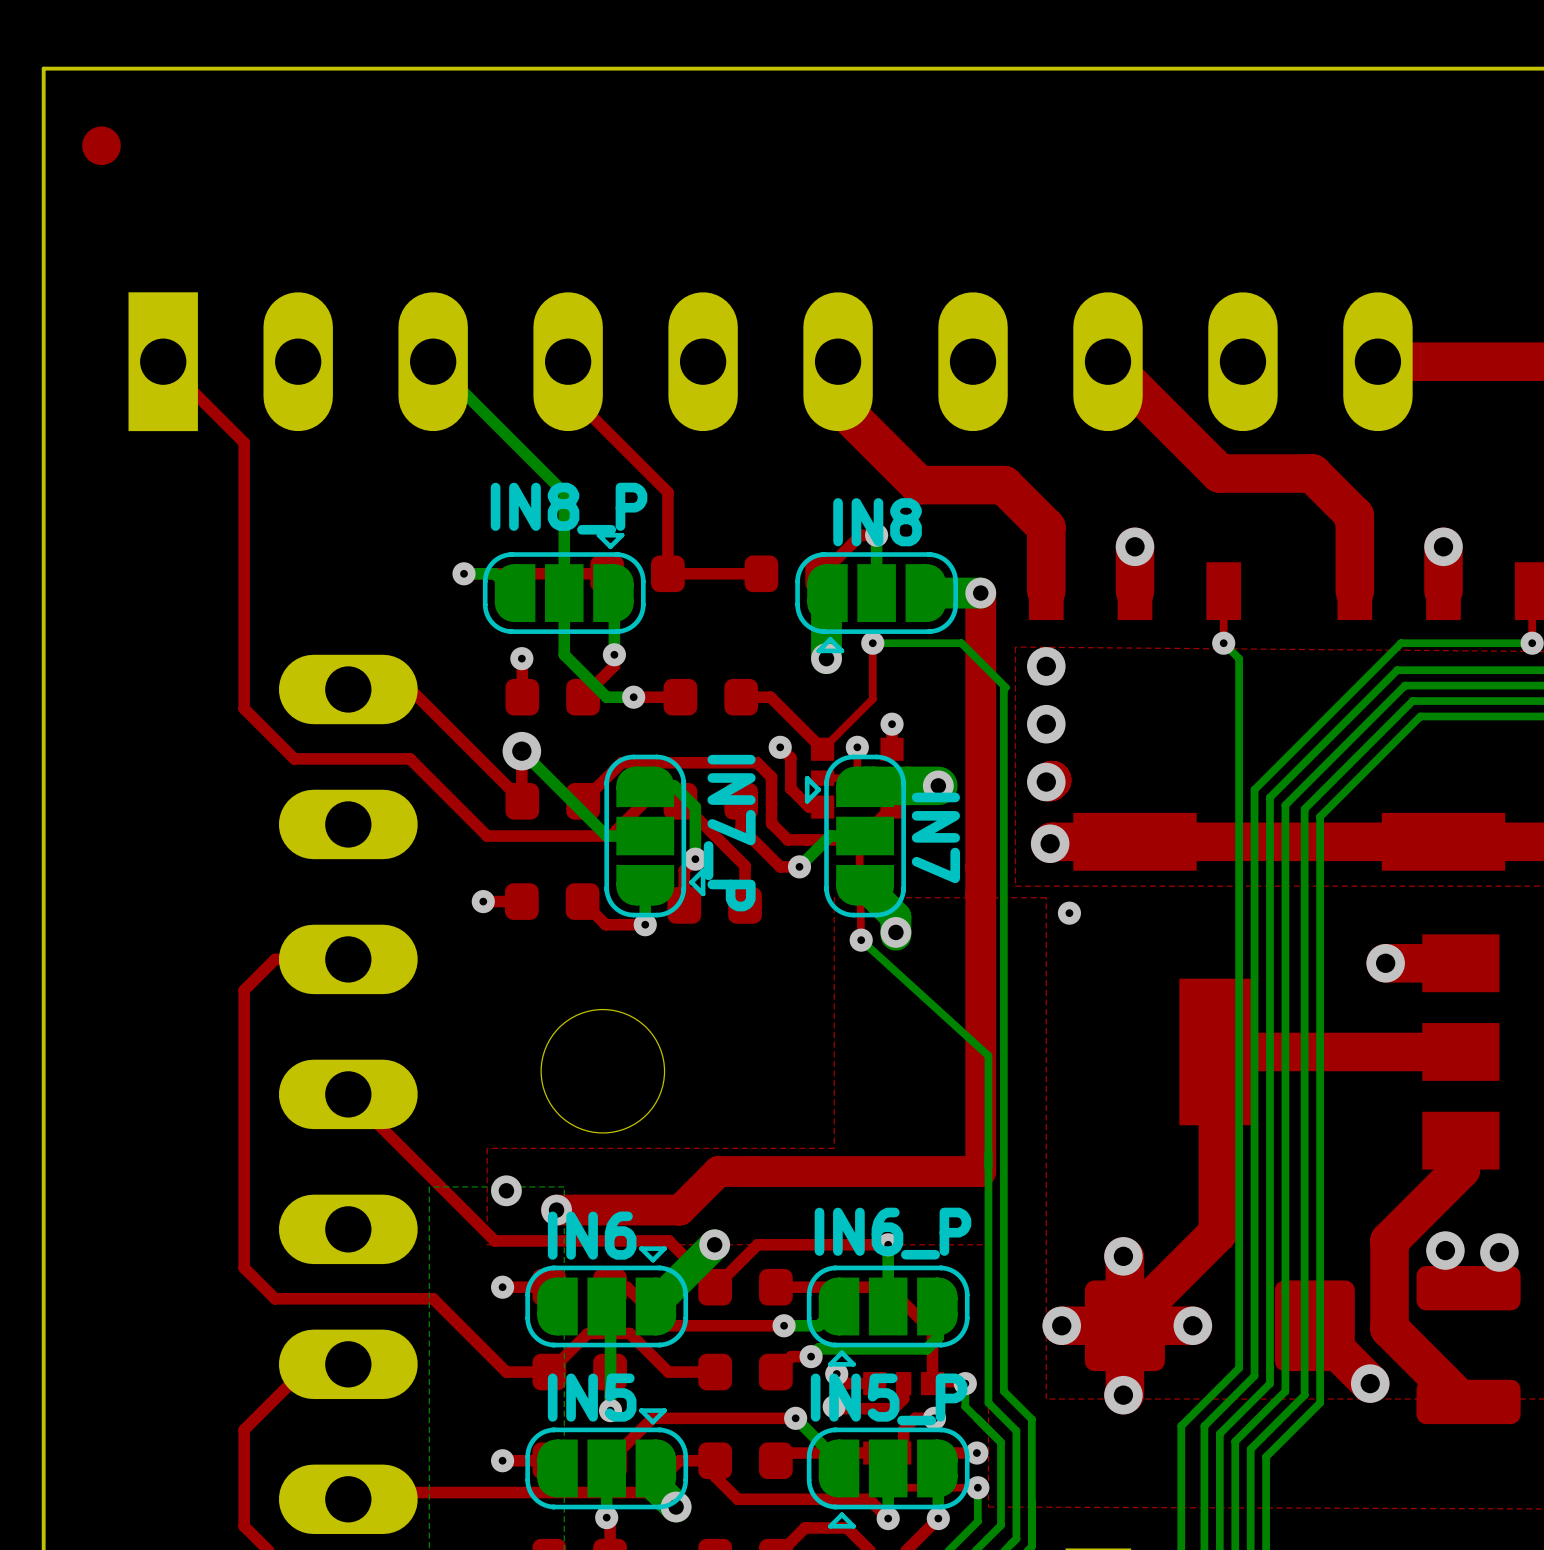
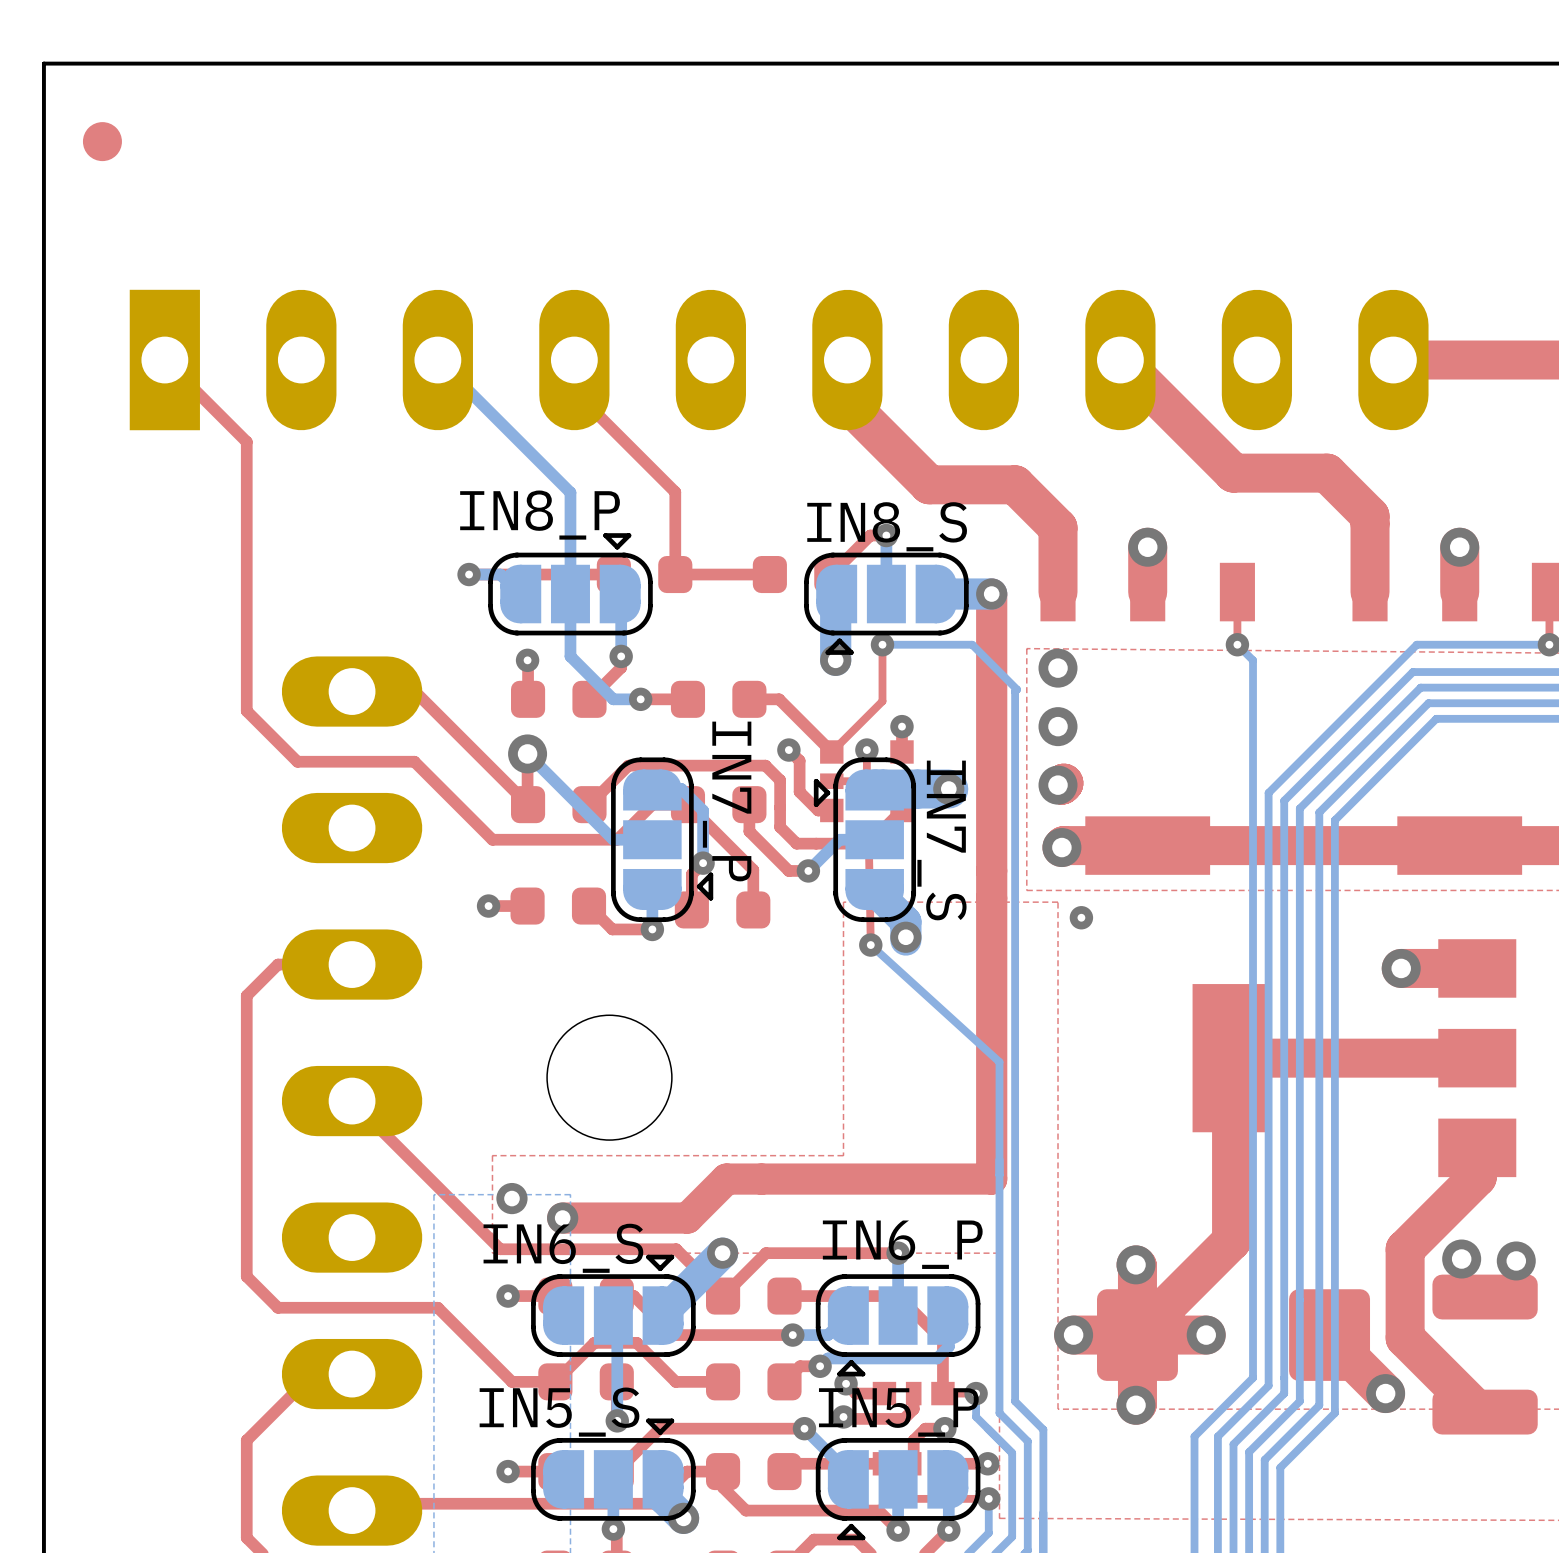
text position: IN8_P (569, 508) -> IN8_P (540, 515)
text: IN8 (877, 522) -> IN8_S (887, 526)
text position: IN7_P (729, 833) -> IN7_P (727, 801)
text: IN7 (935, 837) -> IN7_S (941, 840)
text: IN6 (592, 1235) -> IN6_S (563, 1248)
text: IN5 (592, 1397) -> IN5_S (559, 1412)

